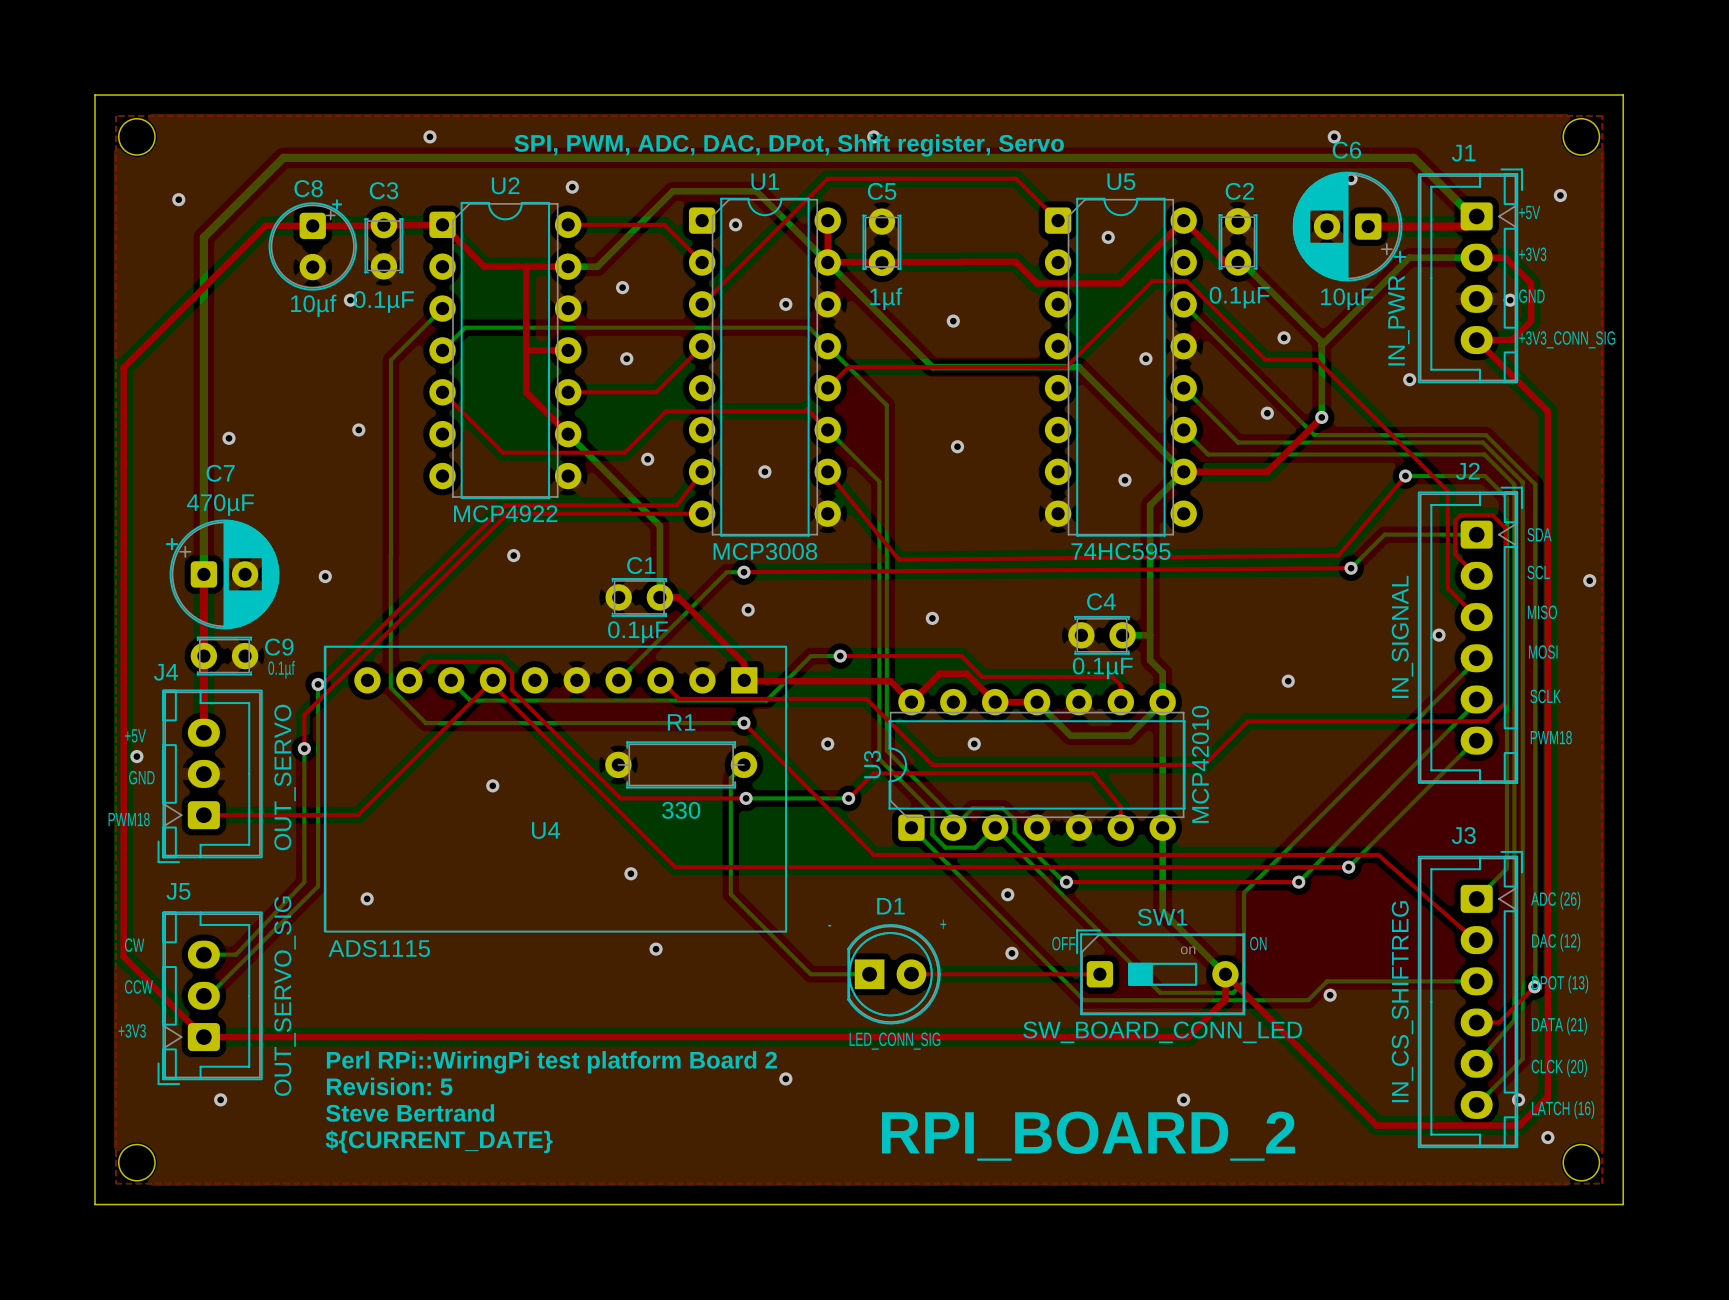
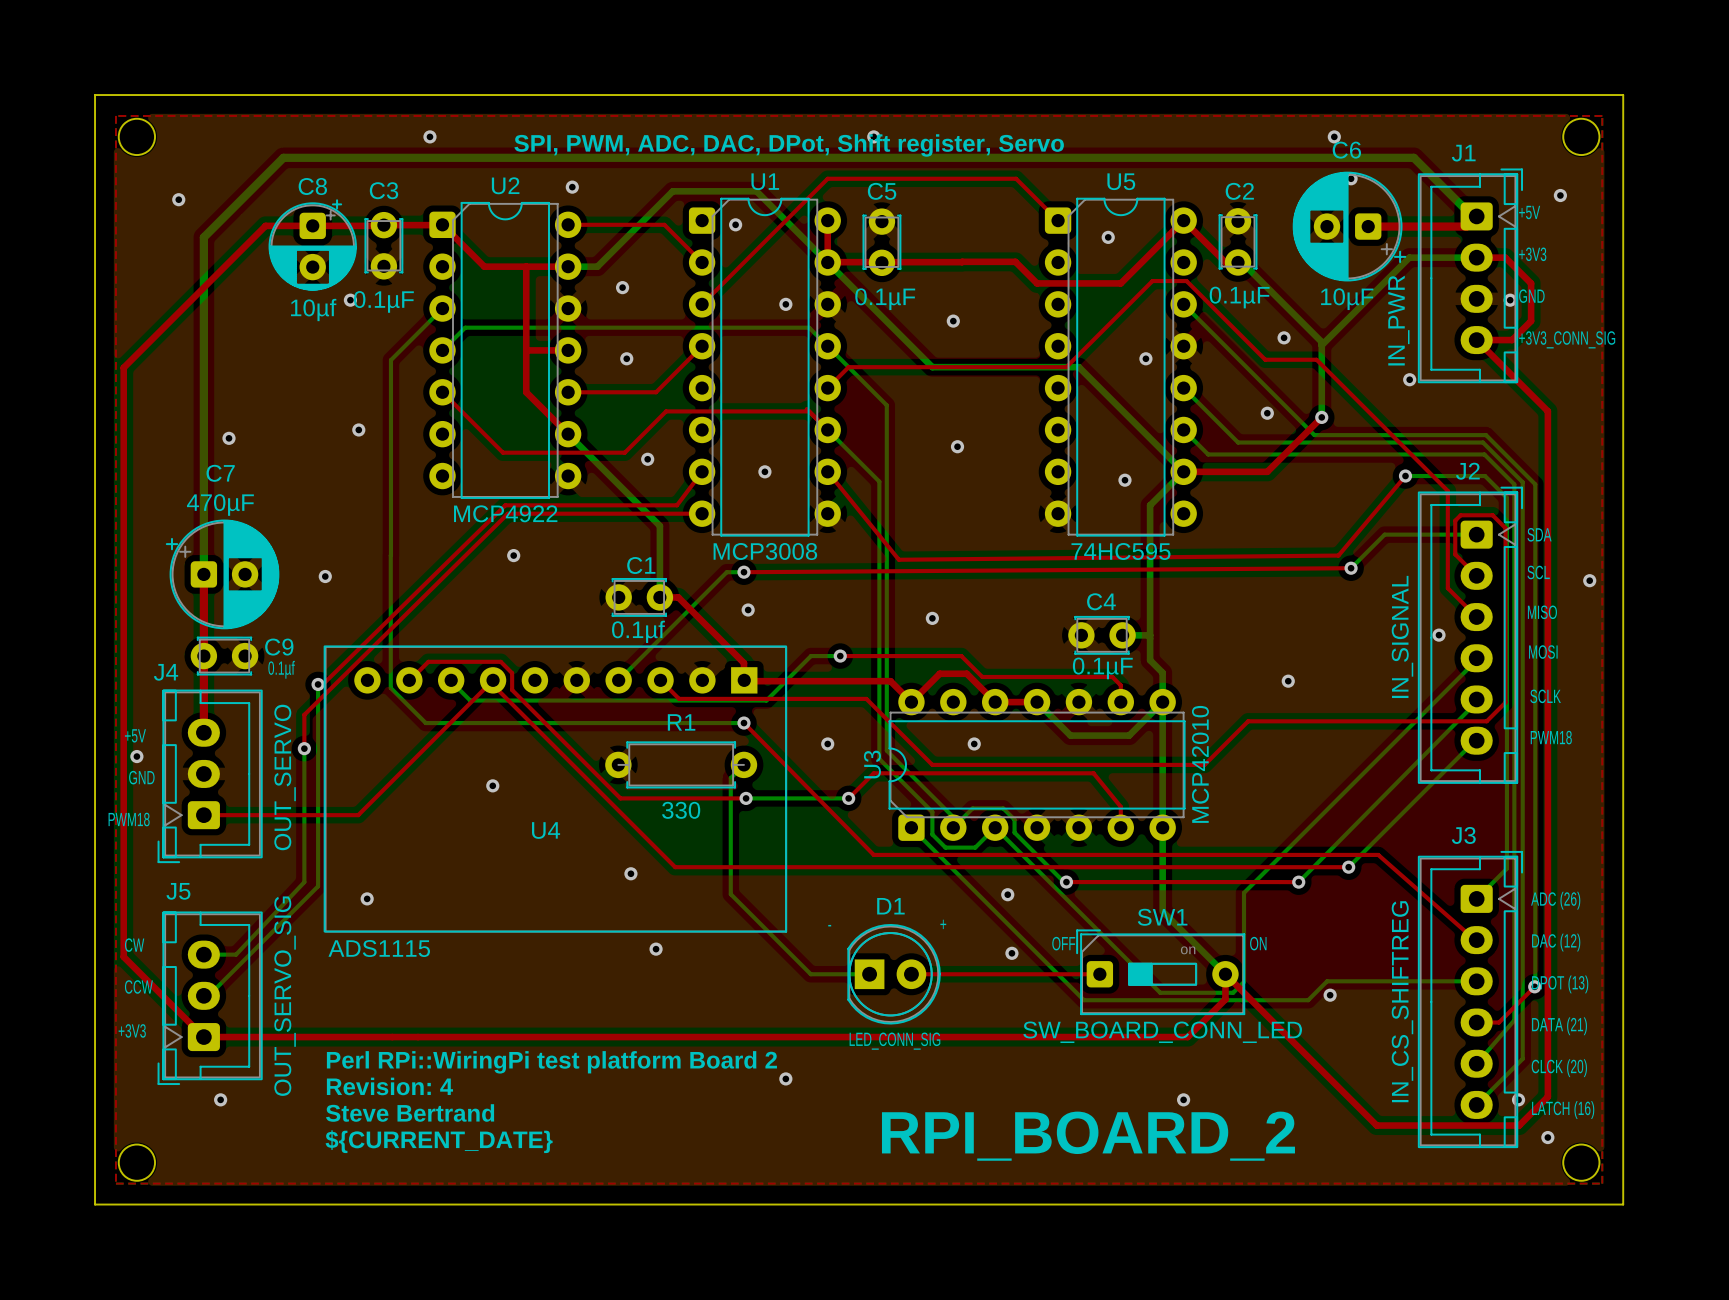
C8 footprint: [268, 199, 357, 291] -> [268, 199, 357, 291]
C5 value: 1µf (886, 298) -> 0.1µF (885, 299)
C1 value: 0.1µF (637, 632) -> 0.1µf (638, 631)
text: Revision: 5 (389, 1086) -> Revision: 4 (389, 1086)

